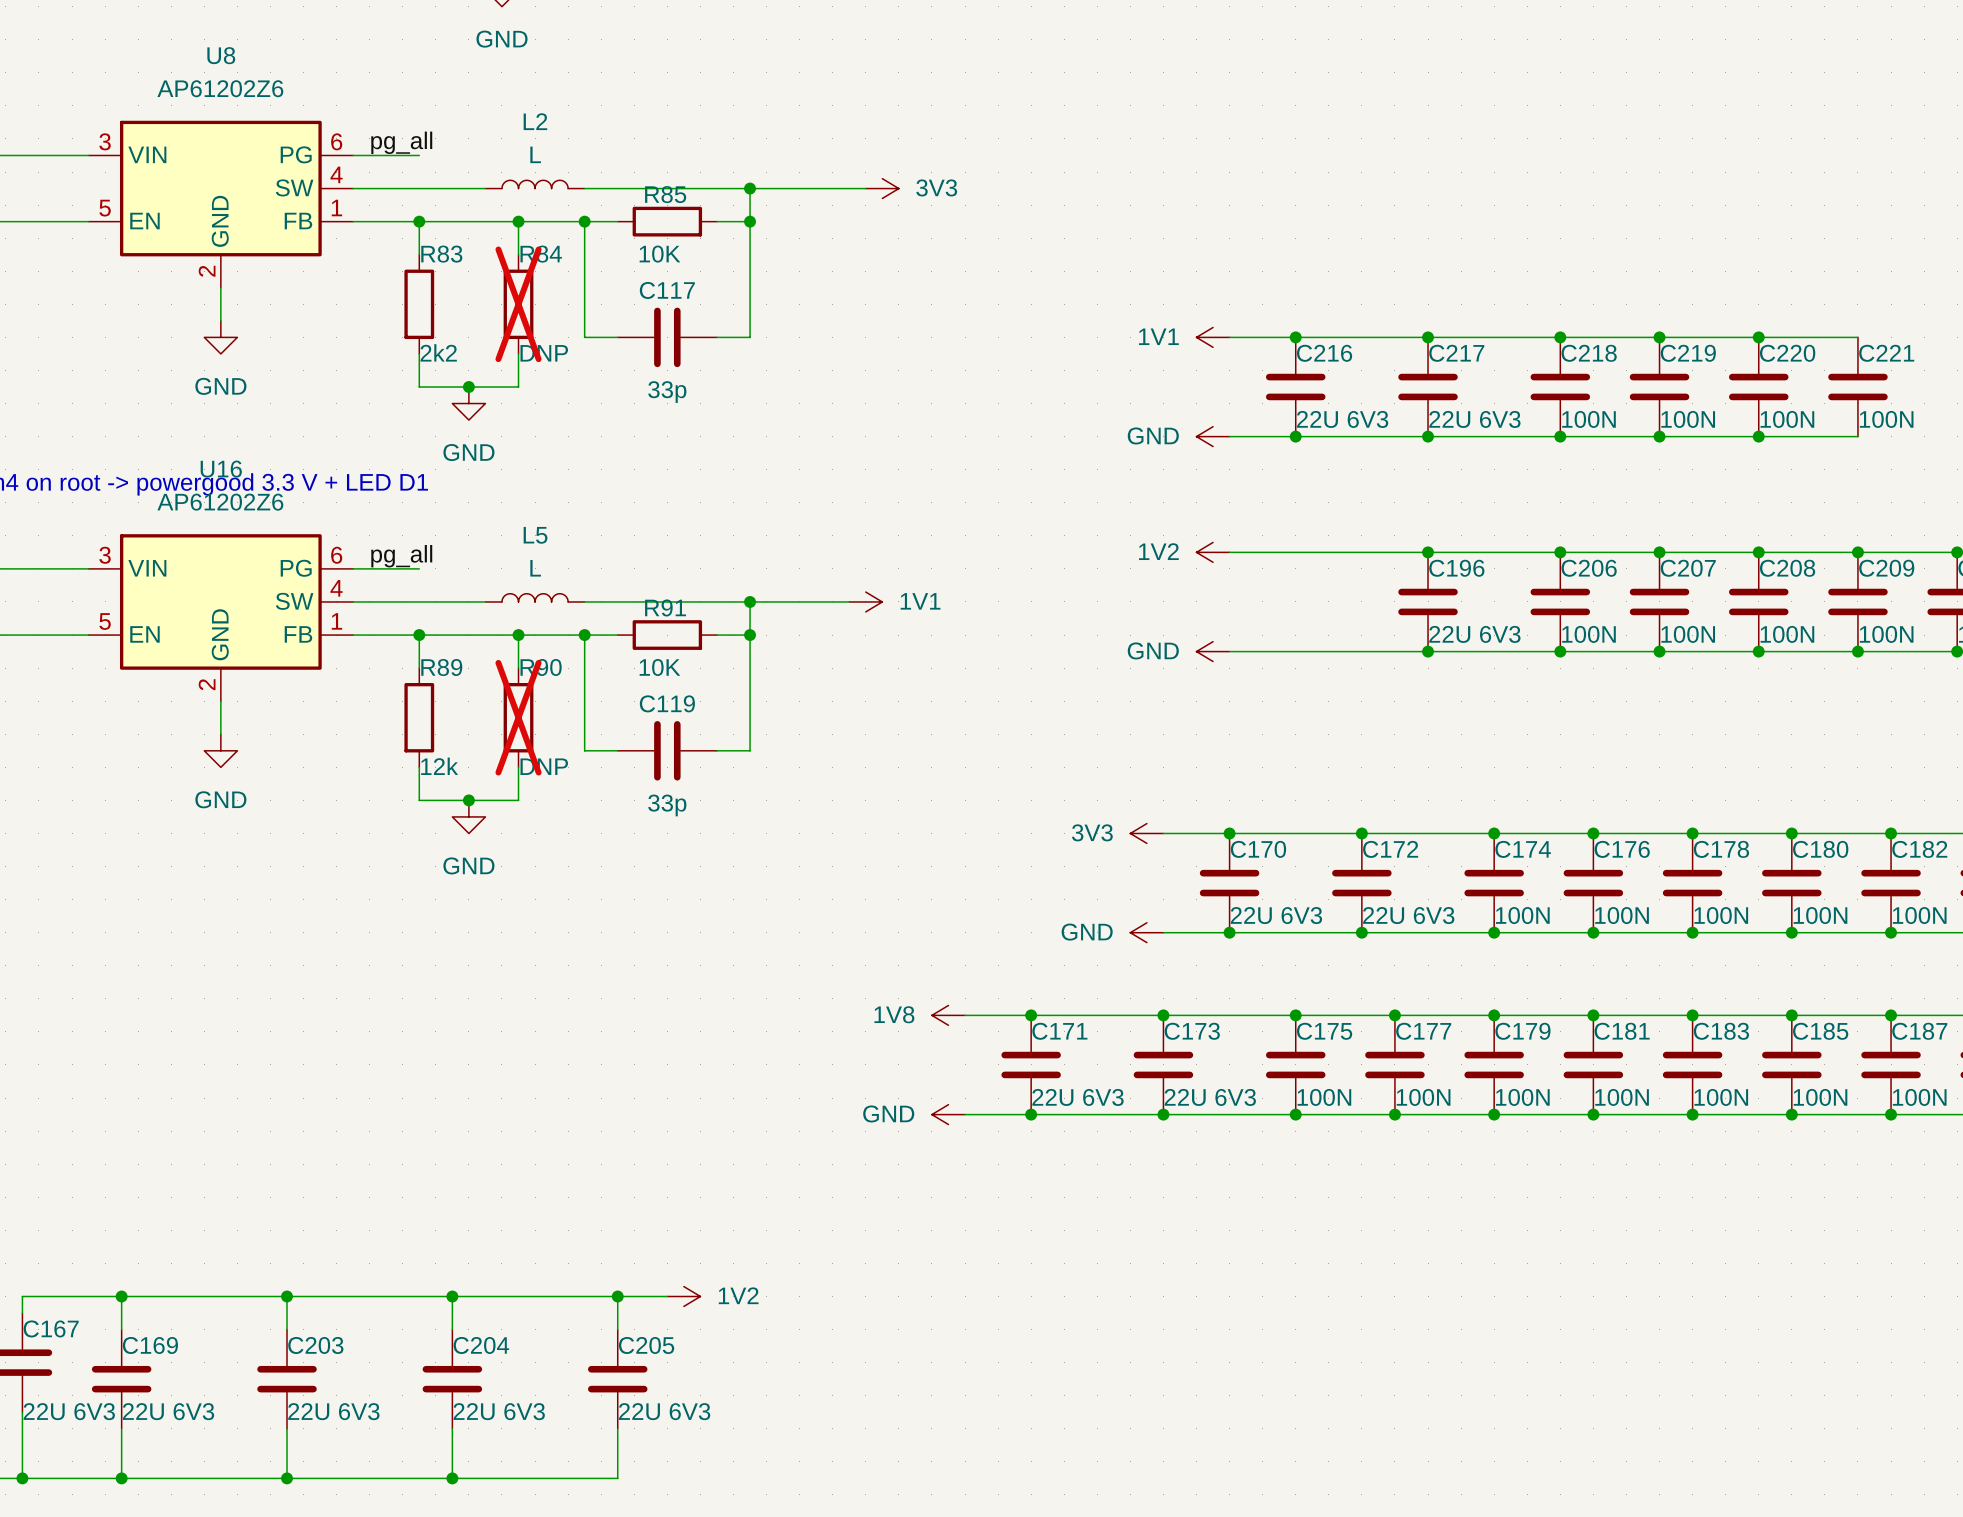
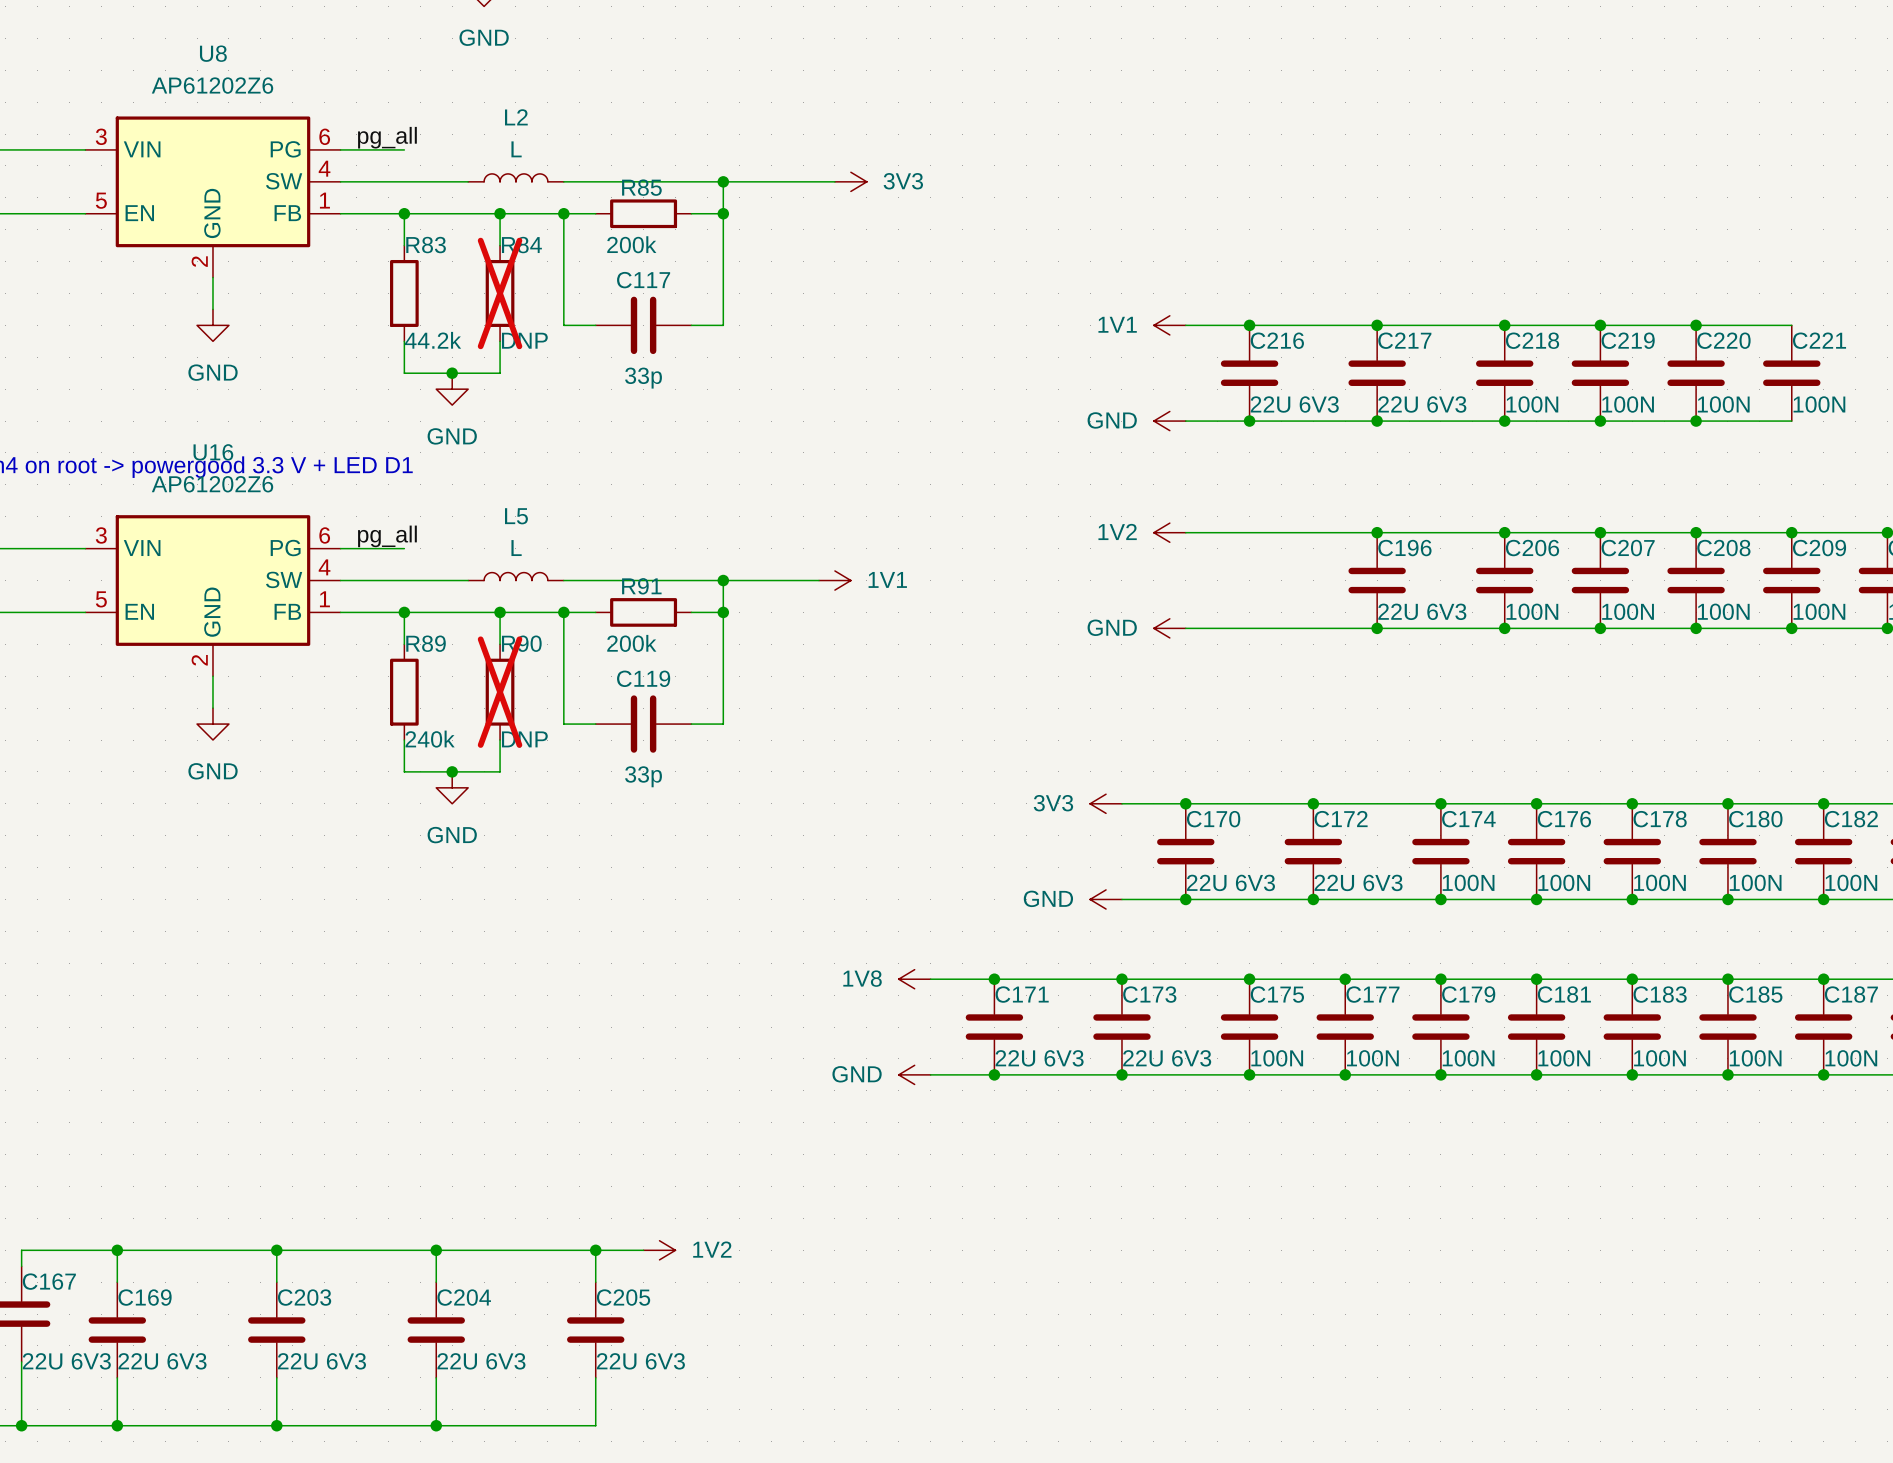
R85 value: 10K (659, 254) -> 200k (631, 244)
R83 value: 2k2 (438, 352) -> 44.2k (432, 340)
R91 value: 10K (659, 667) -> 200k (631, 643)
R89 value: 12k (439, 766) -> 240k (430, 739)

